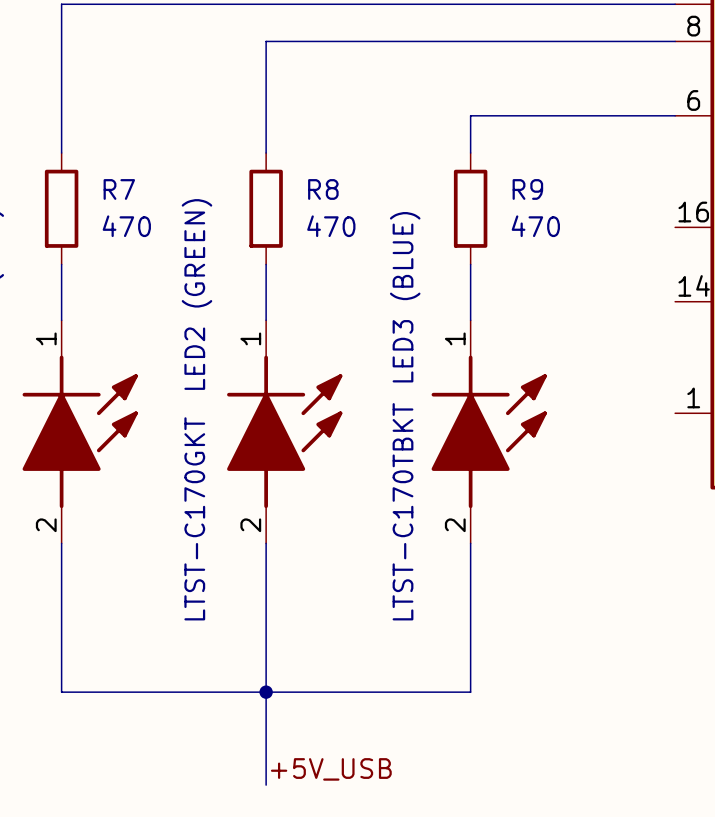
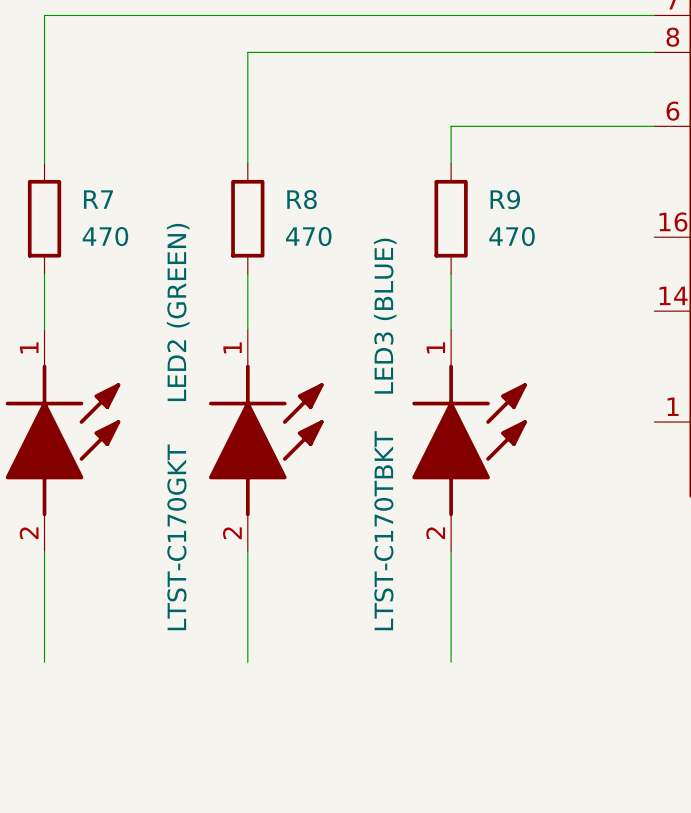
wire: (61, 654) (61, 692) (470, 692) (470, 654) -> none
wire: (266, 654) (266, 785) -> none
junction: (266, 692) -> none
label: +5V_USB (331, 769) -> none

